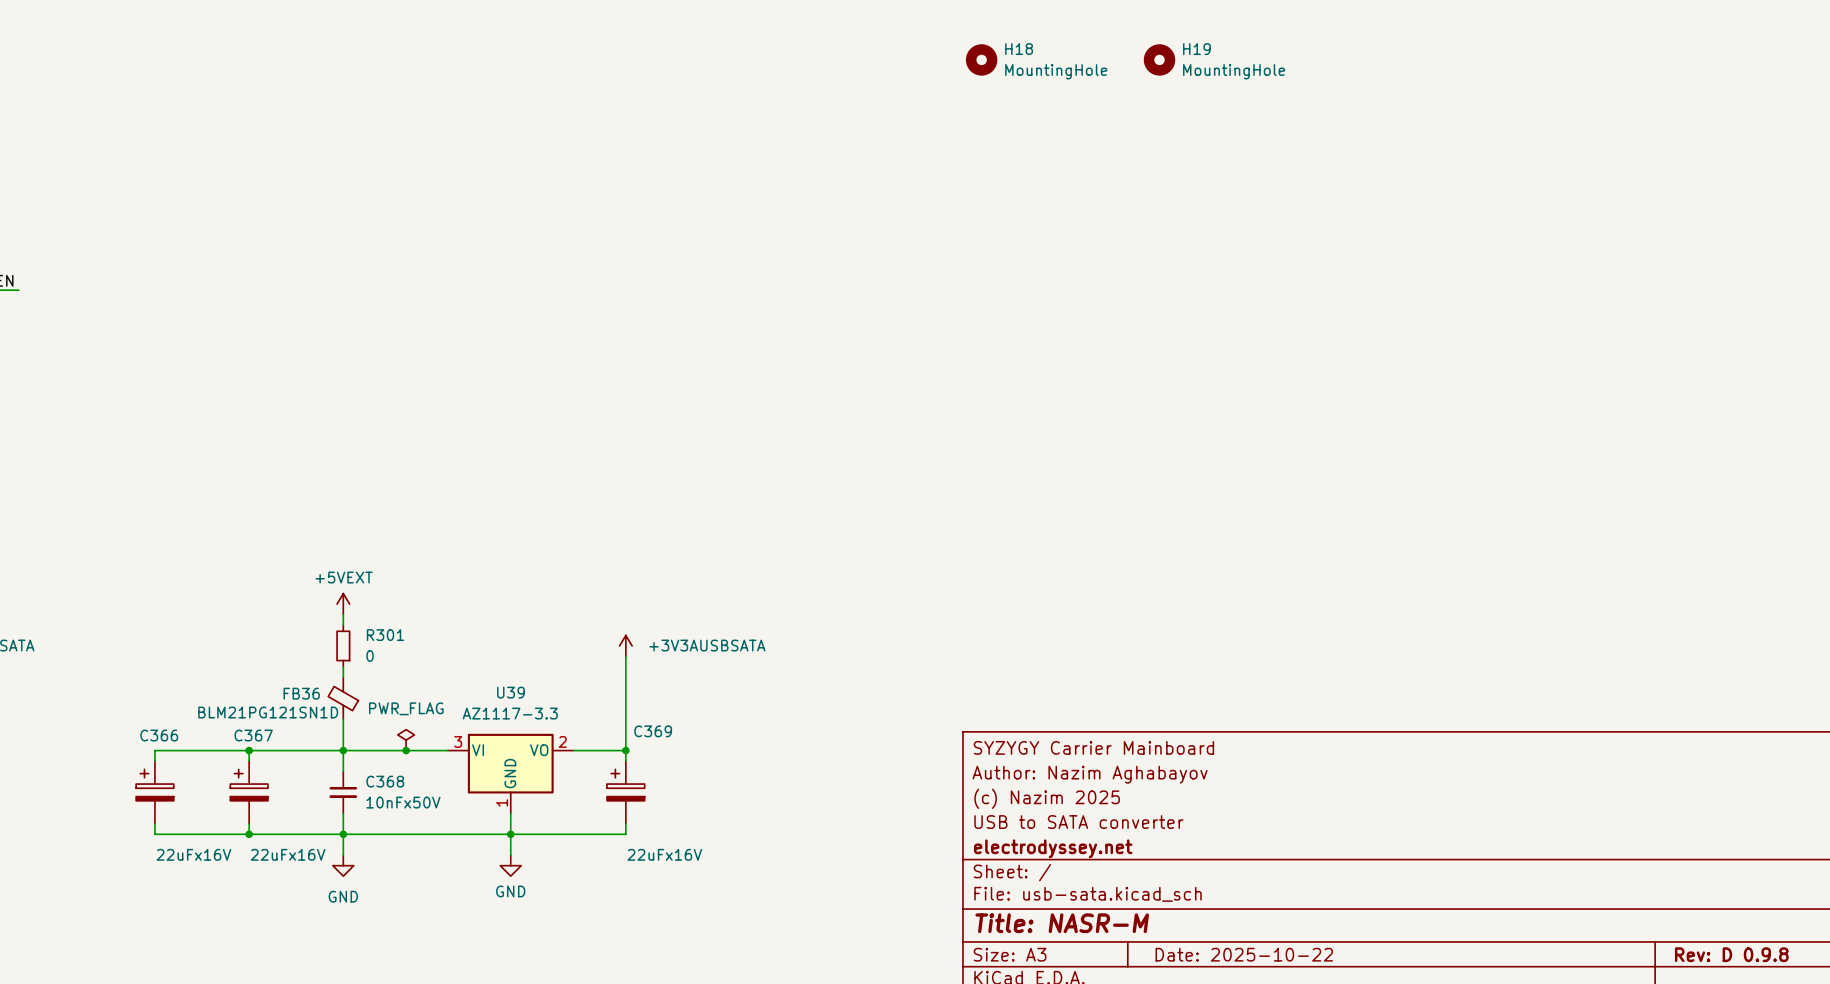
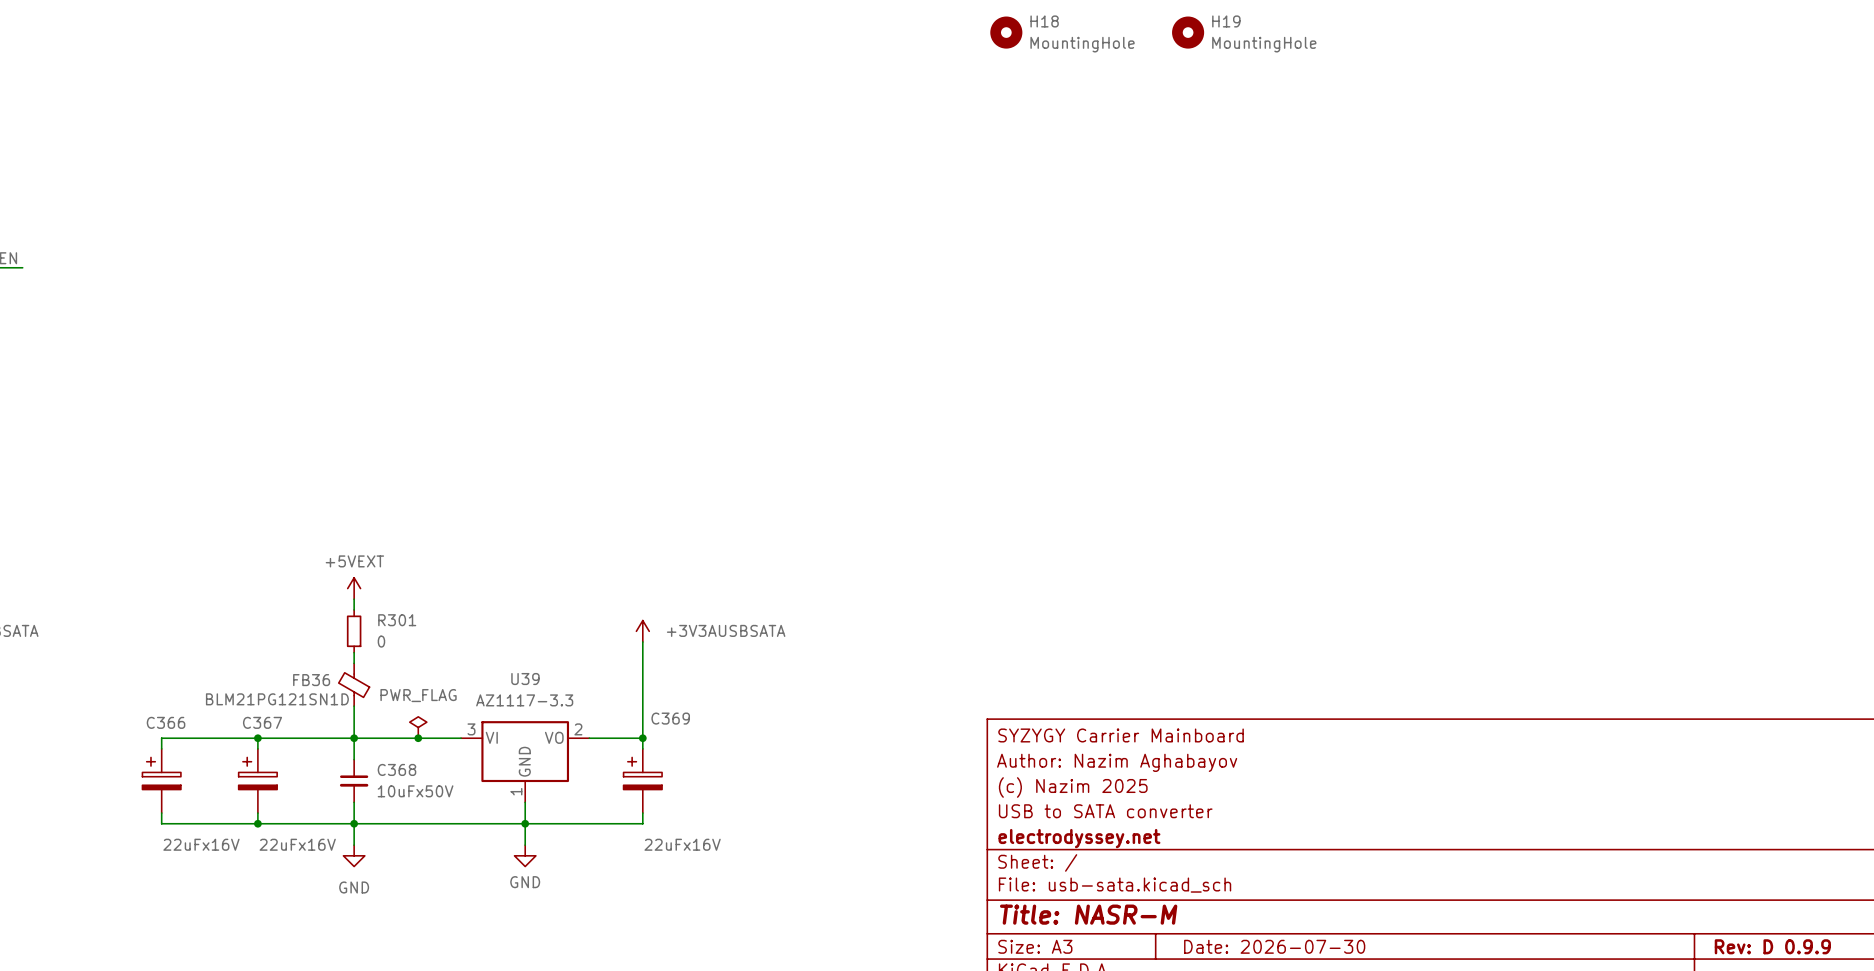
C368 value: 10nFx50V (403, 802) -> 10uFx50V (415, 791)
title block: Date: 2025-10-22 (1244, 954) -> Date: 2026-07-30 (1274, 946)
title block: Rev: D 0.9.8 (1731, 954) -> Rev: D 0.9.9 (1772, 946)

